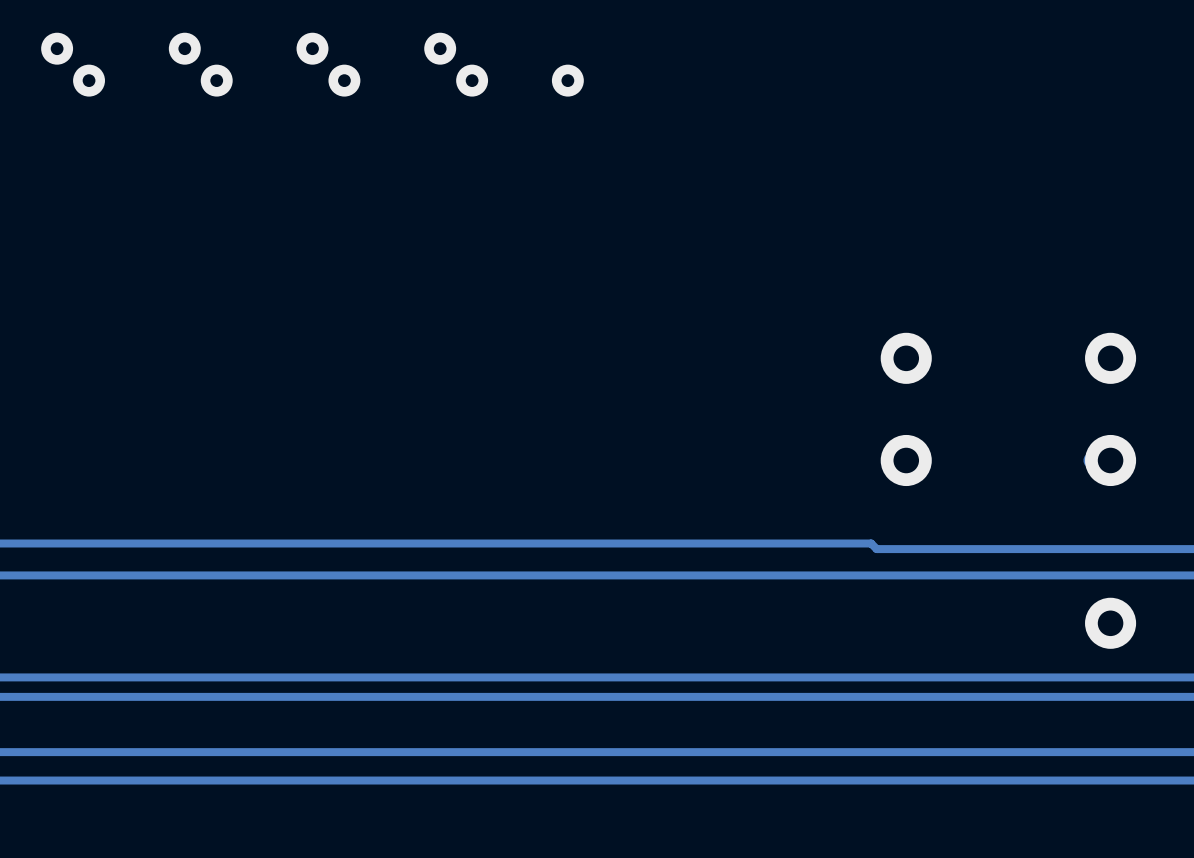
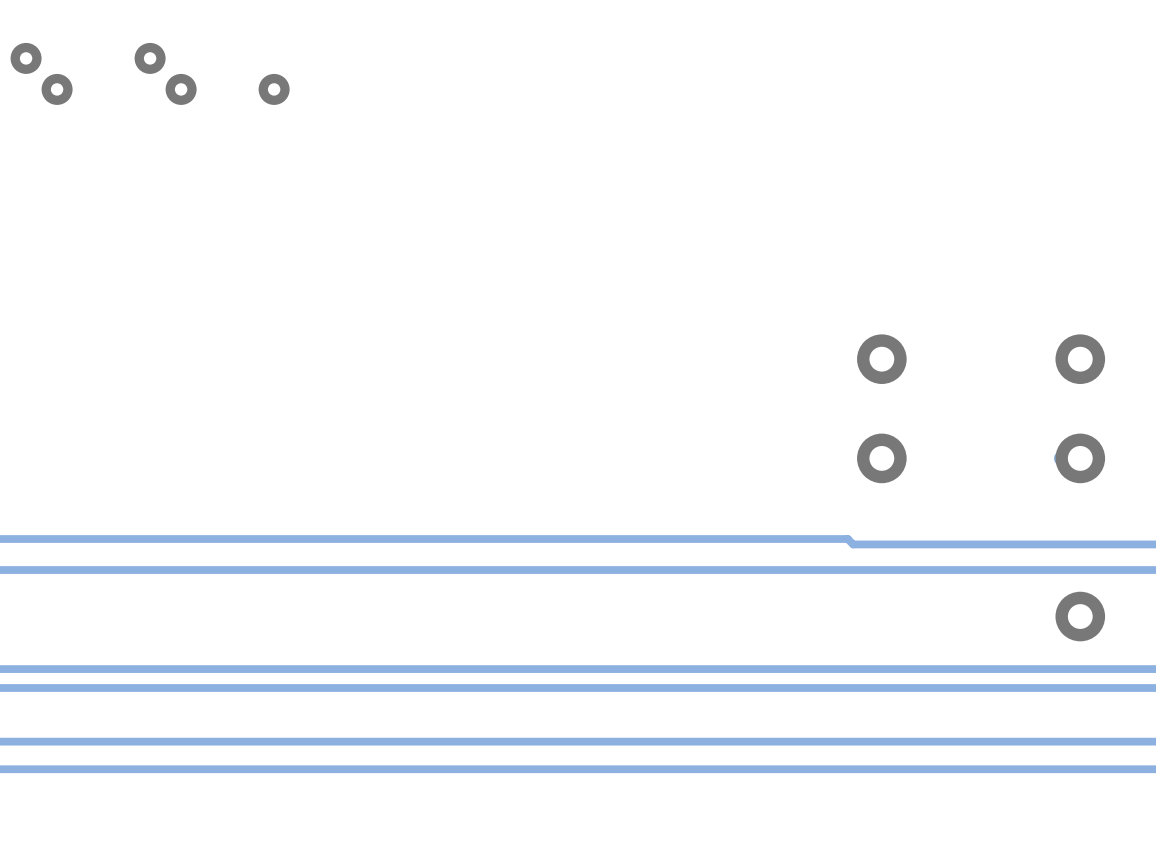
via: none -> (26, 58)
via: (57, 48) -> none
via: none -> (150, 58)
via: (184, 48) -> none
via position: (312, 48) -> (274, 89)
via: (440, 48) -> none
via: none -> (57, 89)
via: (89, 80) -> none
via: none -> (181, 89)
via: (216, 80) -> none
via: (344, 80) -> none
via: (472, 80) -> none
via: (567, 80) -> none

